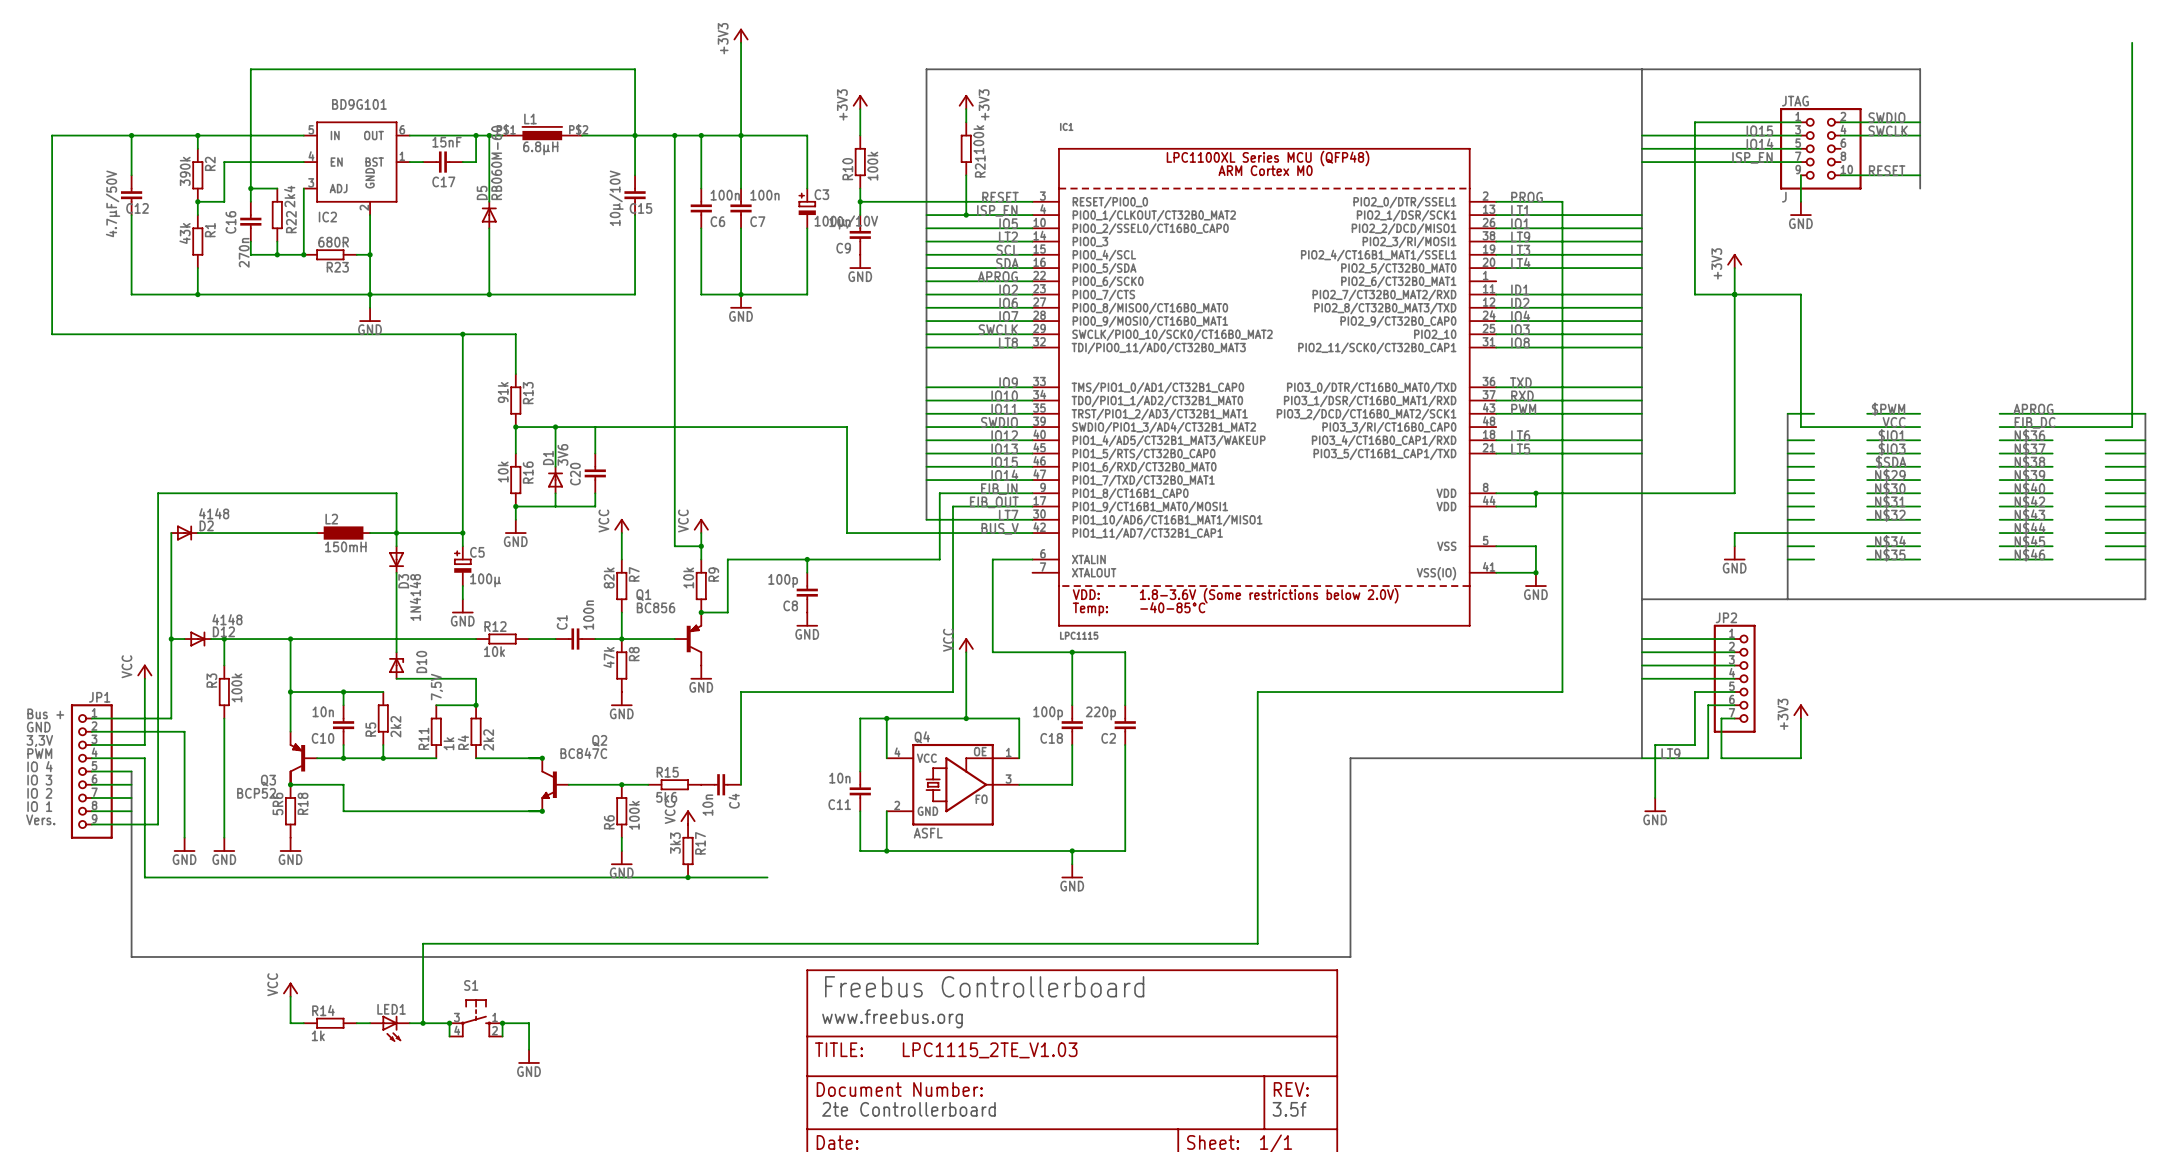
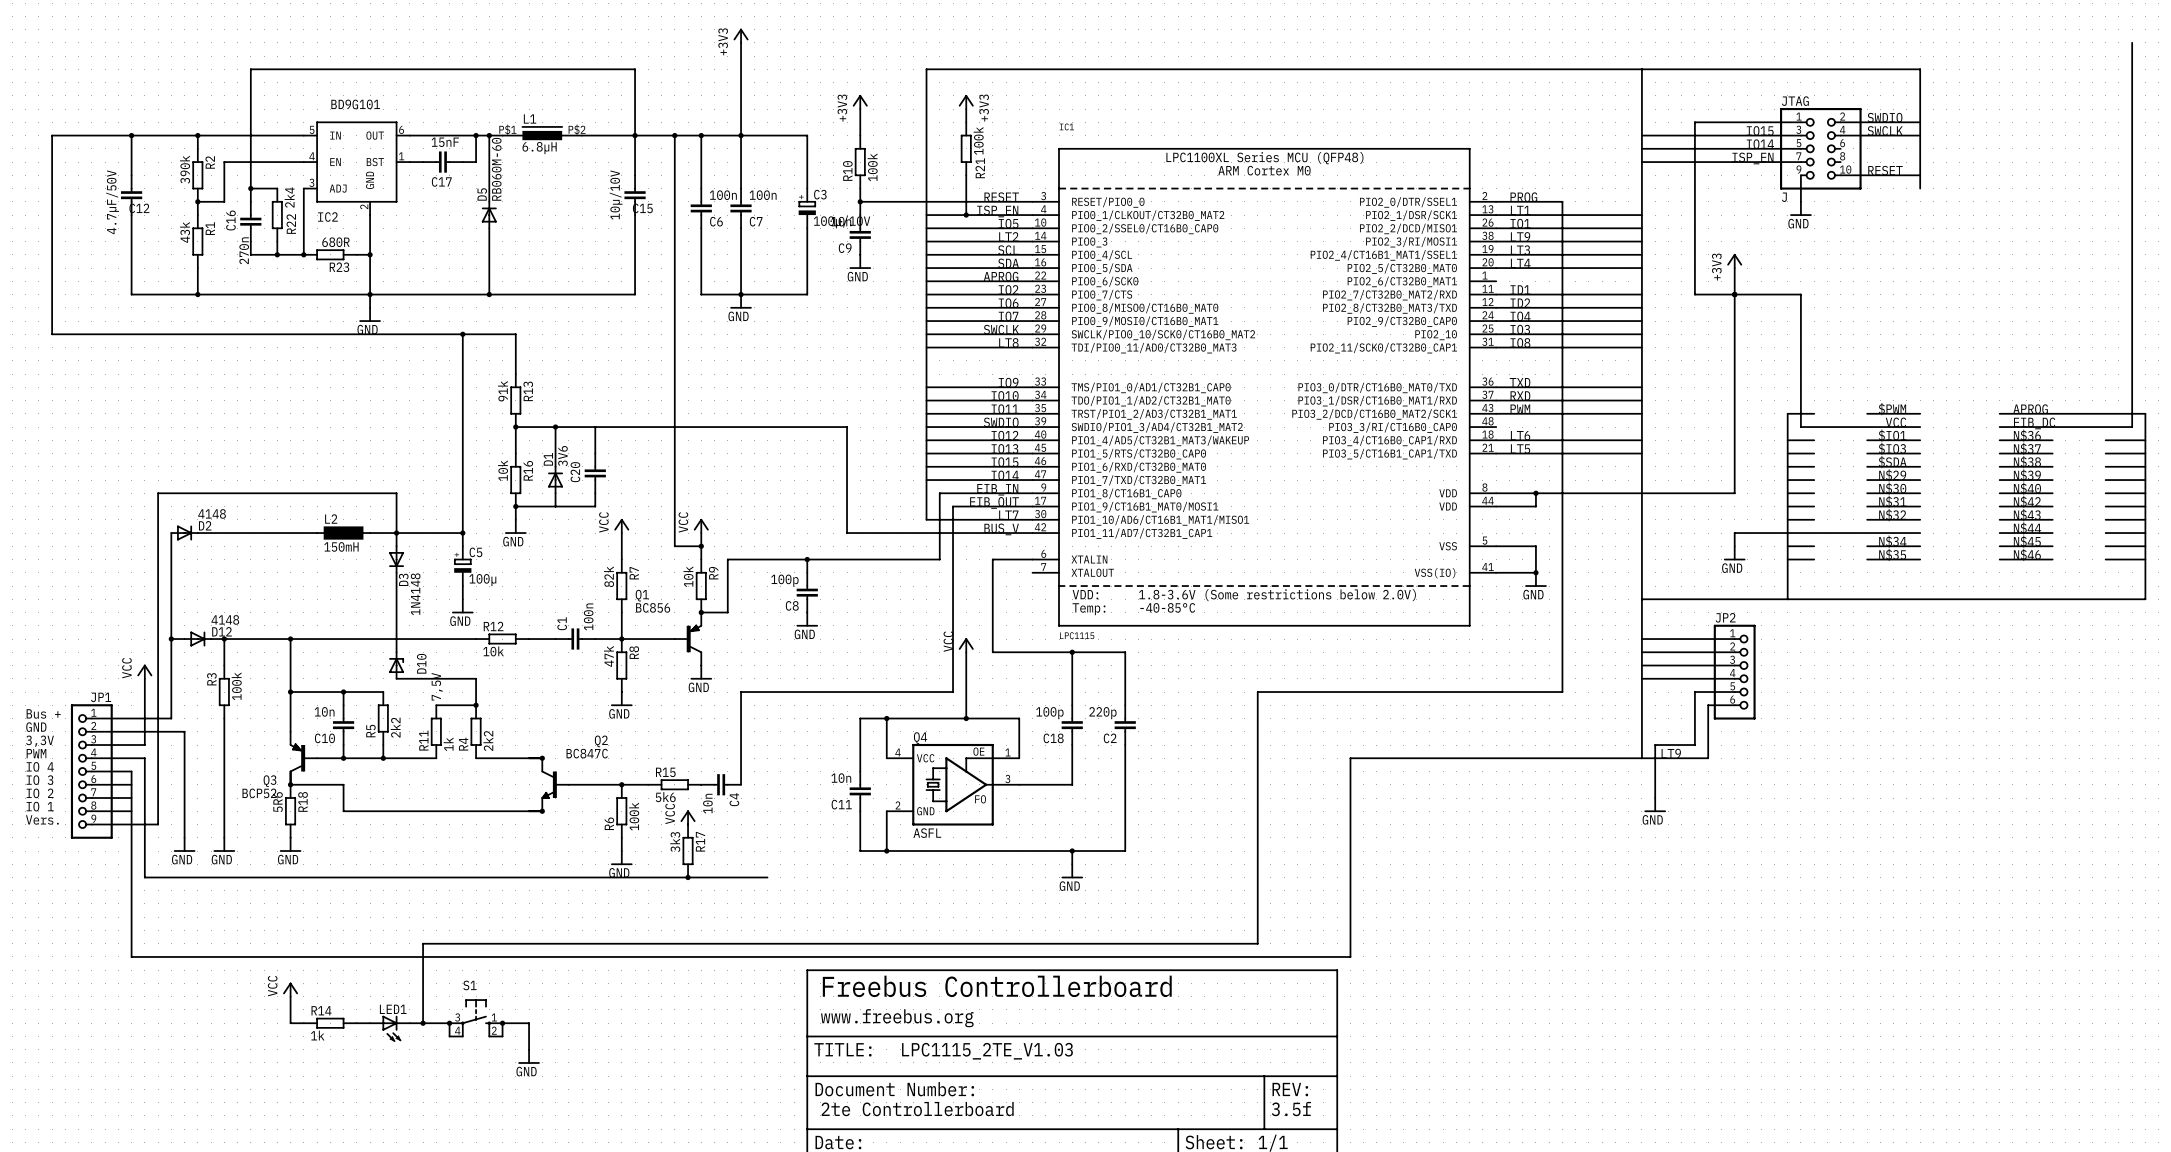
JP2 symbol: [1713, 624, 1756, 733] -> [1713, 624, 1756, 720]
power symbol: +3V3 (1800, 711) -> none
wire: (1734, 718) (1721, 718) (1721, 758) (1800, 758) (1800, 718) -> none

